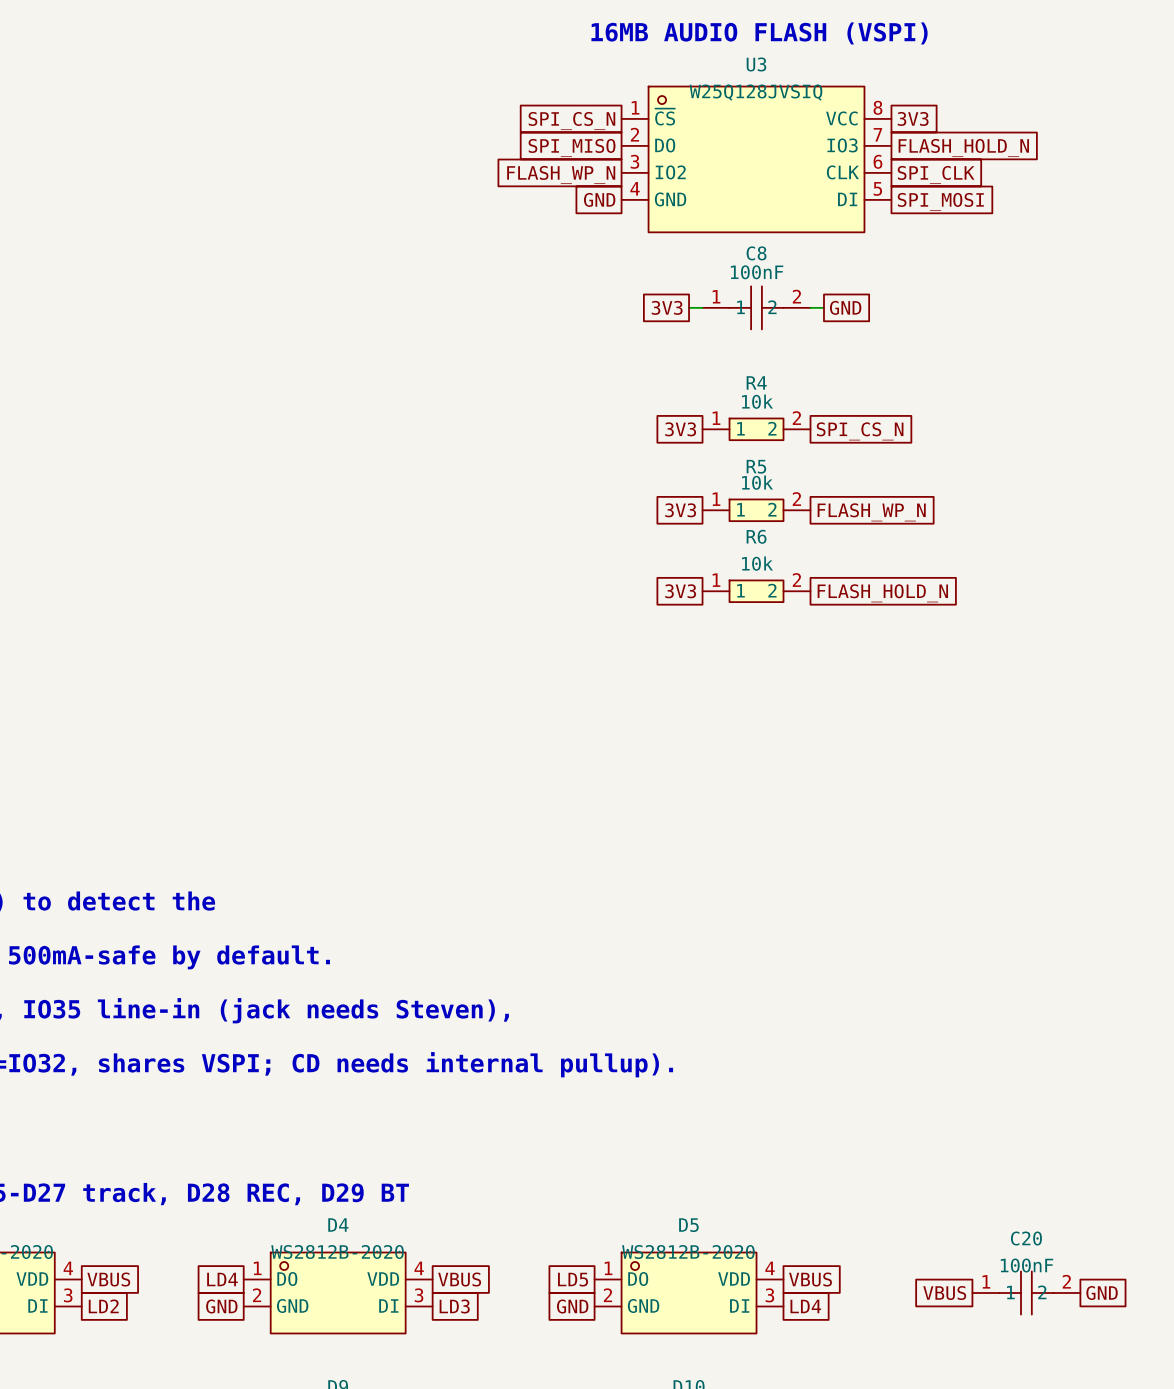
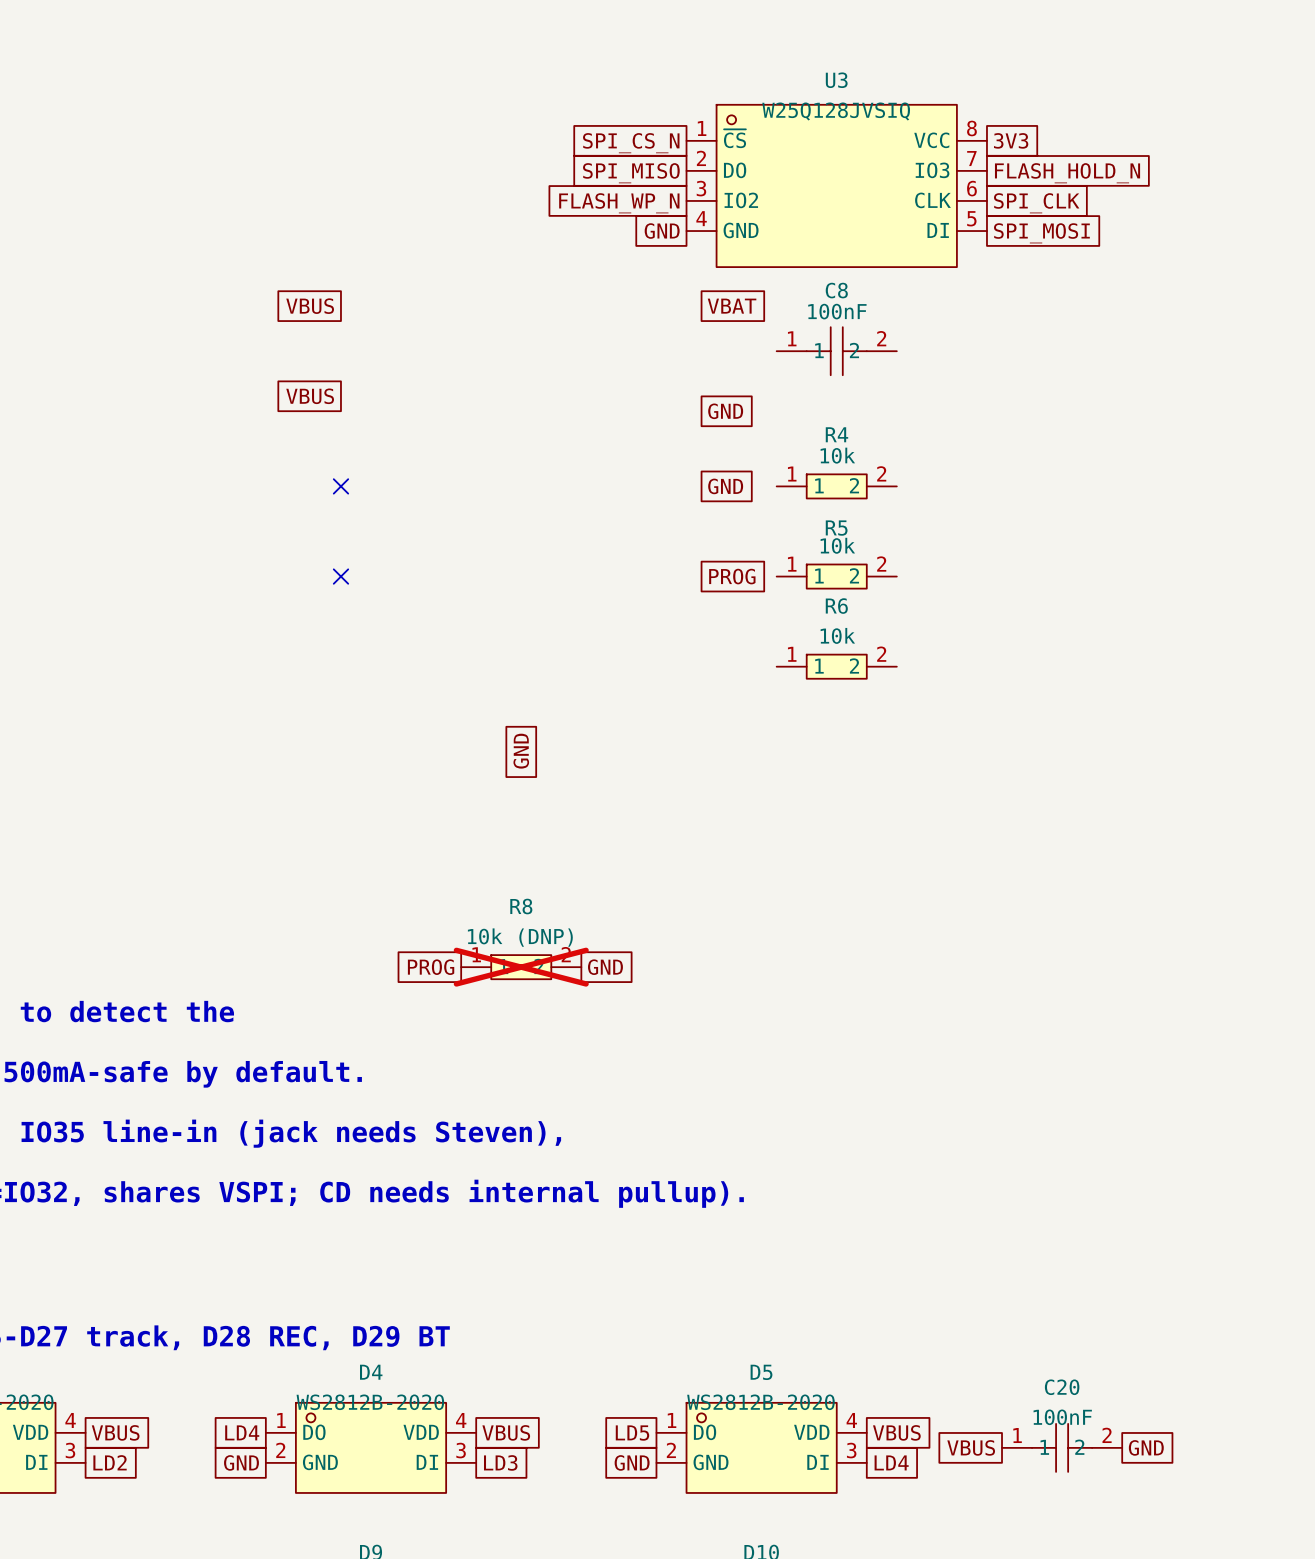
text: 16MB AUDIO FLASH (VSPI) (759, 33) -> none
global label: none -> VBUS (310, 306)
global label: none -> VBAT (732, 306)
global label: 3V3 (667, 307) -> none
wire: (689, 307) (702, 307) -> none
wire: (810, 307) (823, 307) -> none
global label: GND (845, 307) -> none
global label: none -> VBUS (310, 396)
global label: none -> GND (725, 411)
no-connect mark: none -> (340, 486)
global label: none -> GND (725, 486)
global label: 3V3 (680, 429) -> none
global label: SPI_CS_N (860, 431) -> none
no-connect mark: none -> (340, 576)
global label: none -> PROG (732, 576)
global label: 3V3 (680, 510) -> none
global label: FLASH_WP_N (871, 512) -> none
global label: 3V3 (680, 591) -> none
global label: FLASH_HOLD_N (882, 593) -> none
global label: none -> GND (521, 751)
global label: none -> PROG (431, 967)
R8: none -> 10k (DNP) (521, 967)
global label: none -> GND (605, 967)
C20 position: (1026, 1292) -> (1062, 1447)
global label position: VBUS (944, 1293) -> VBUS (971, 1447)
global label position: GND (1102, 1293) -> GND (1146, 1447)

